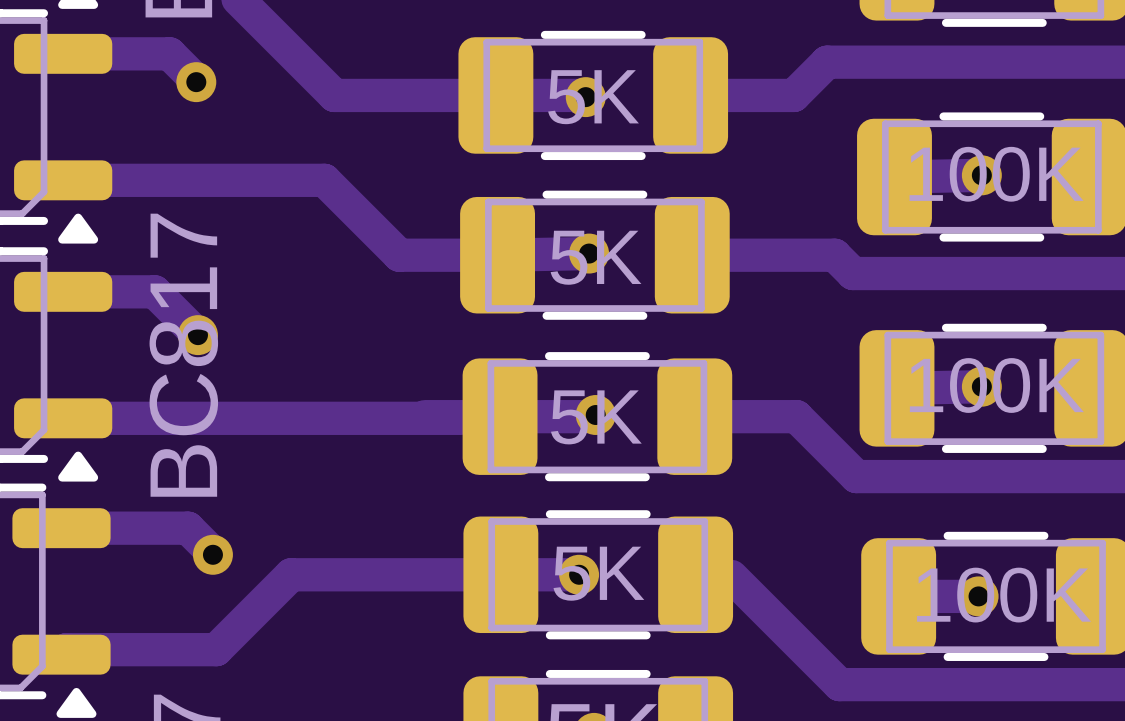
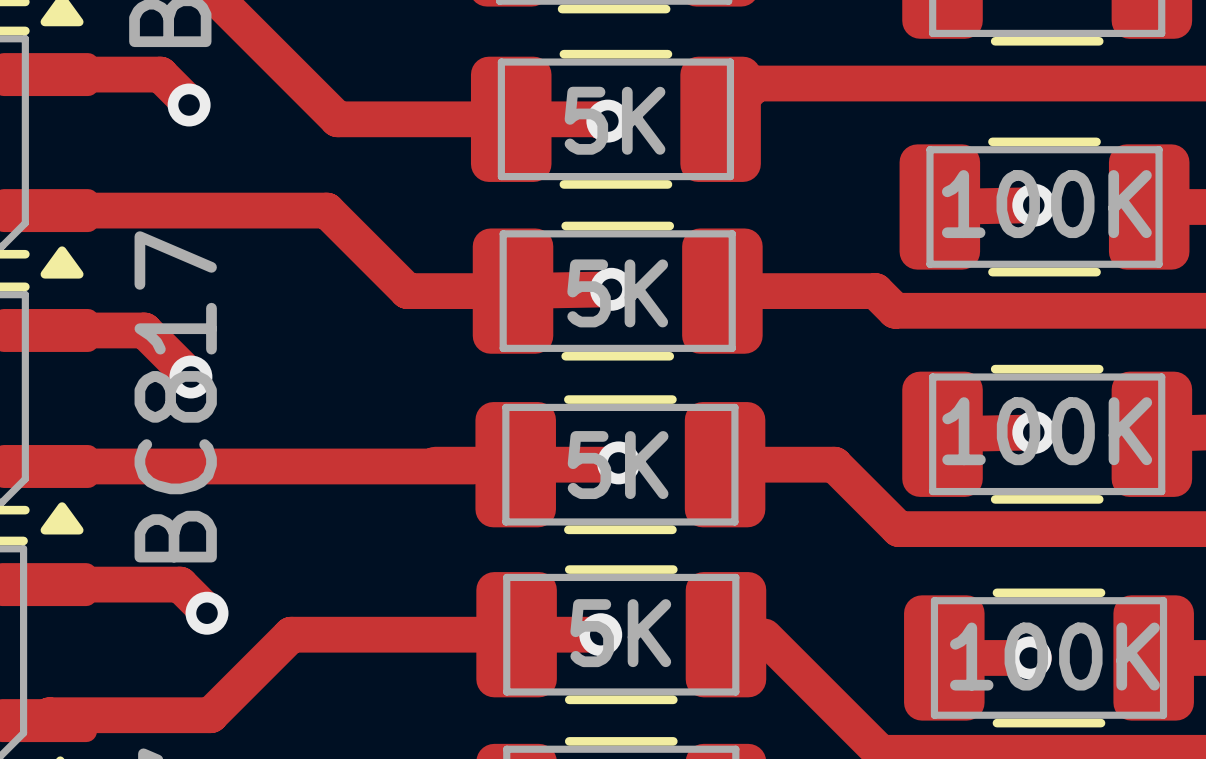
track: (827, 62) (793, 95) (690, 95) -> (867, 83) (756, 83) (720, 119)

